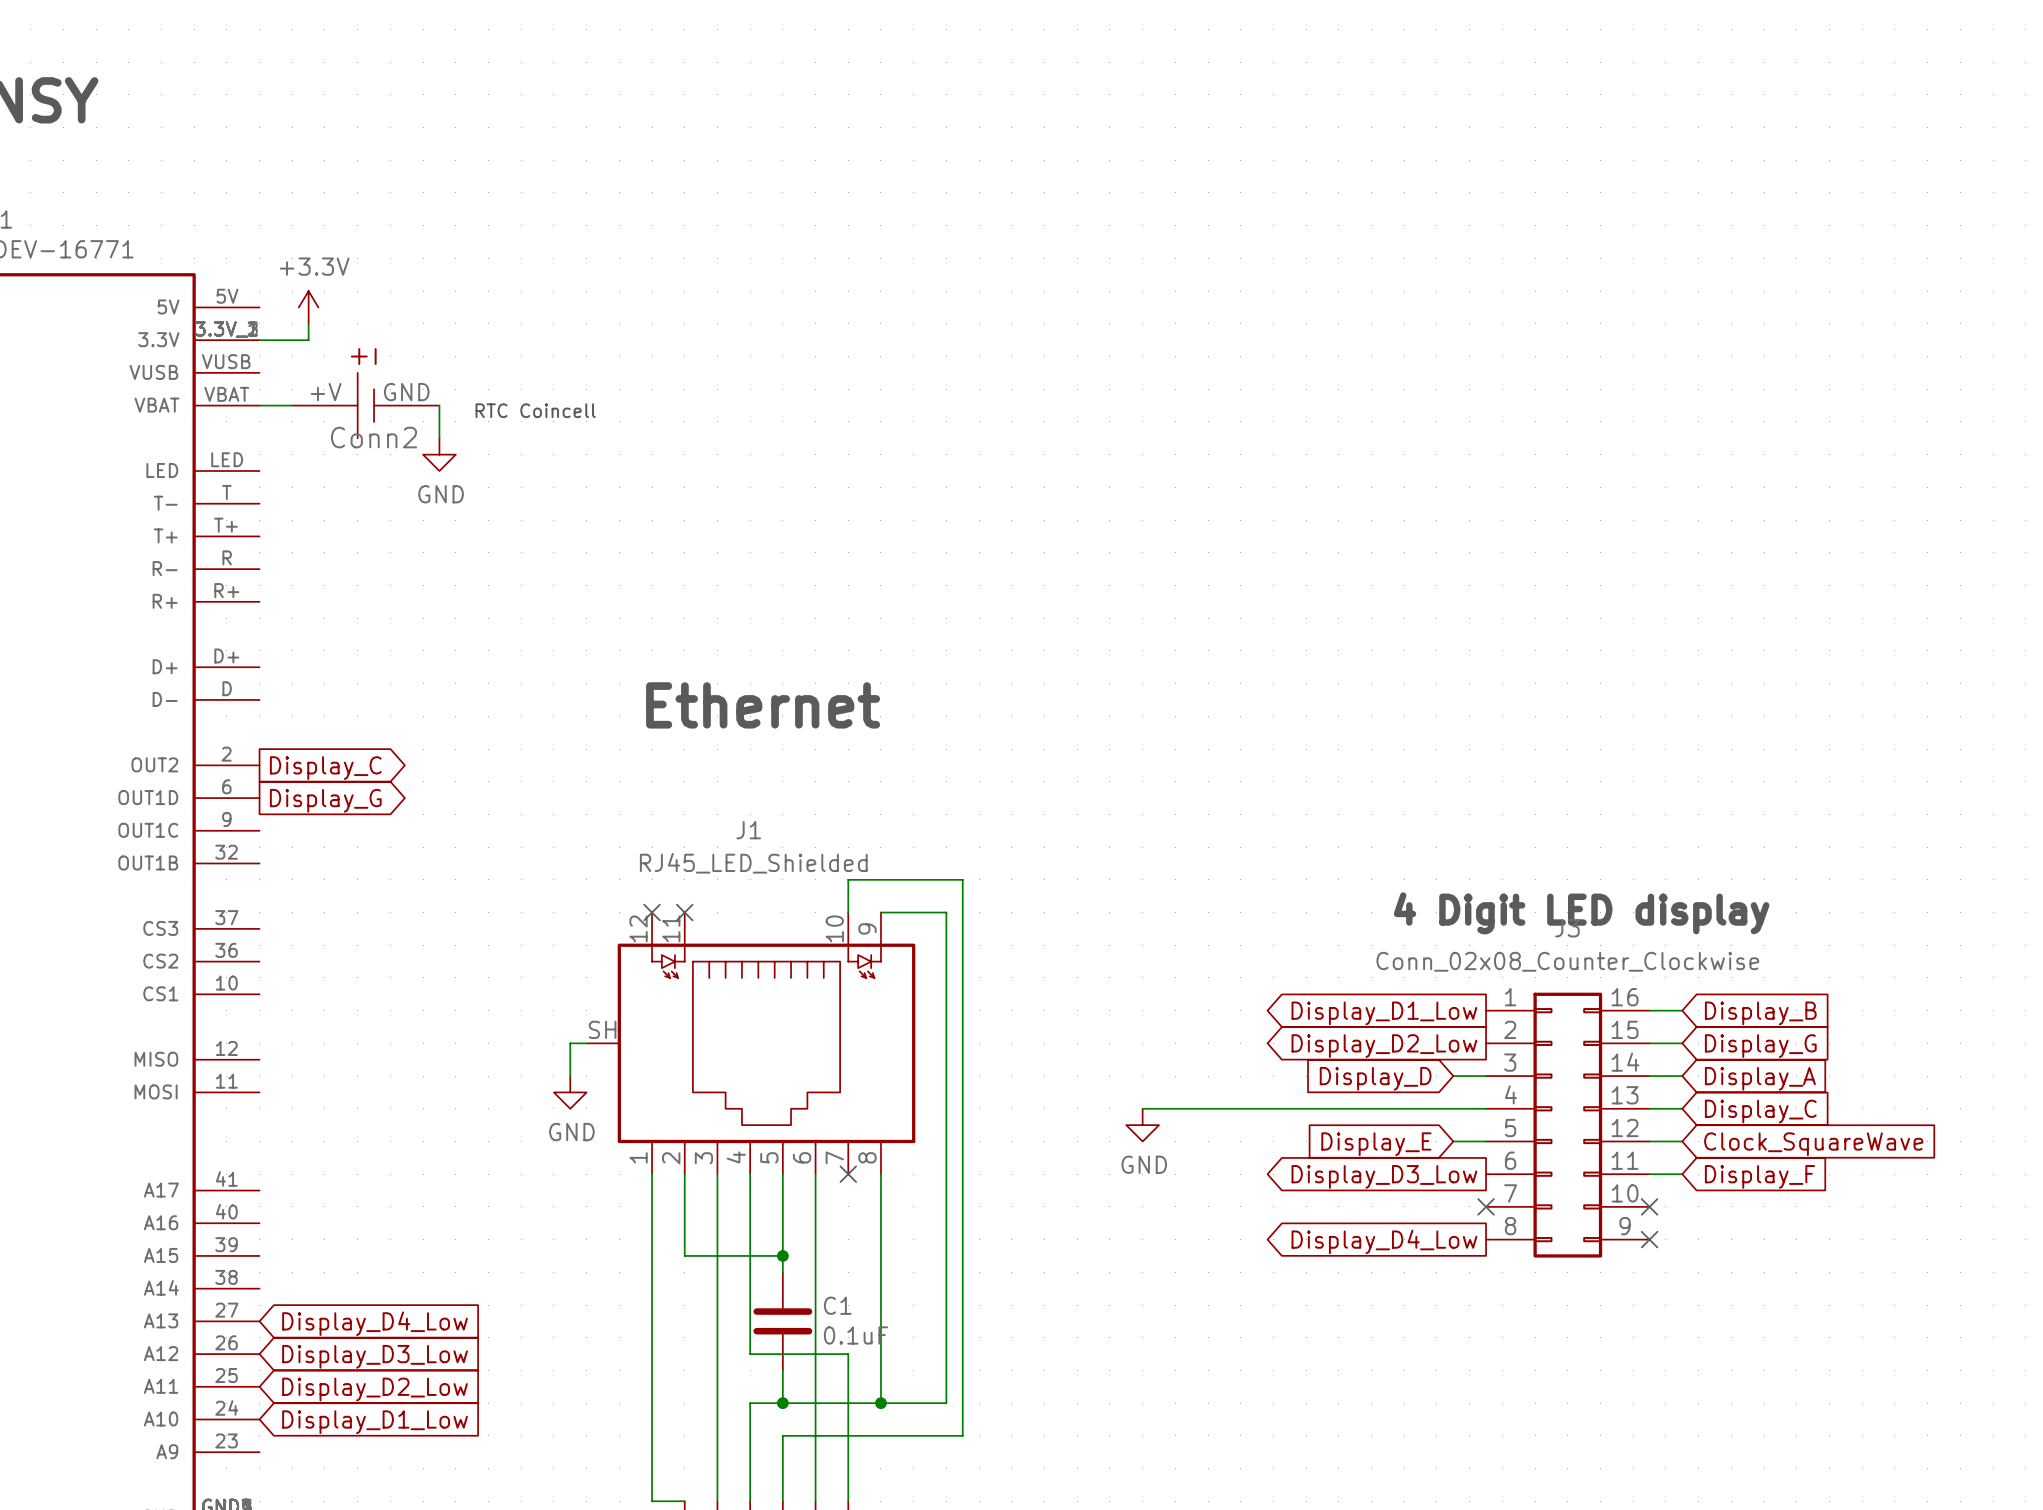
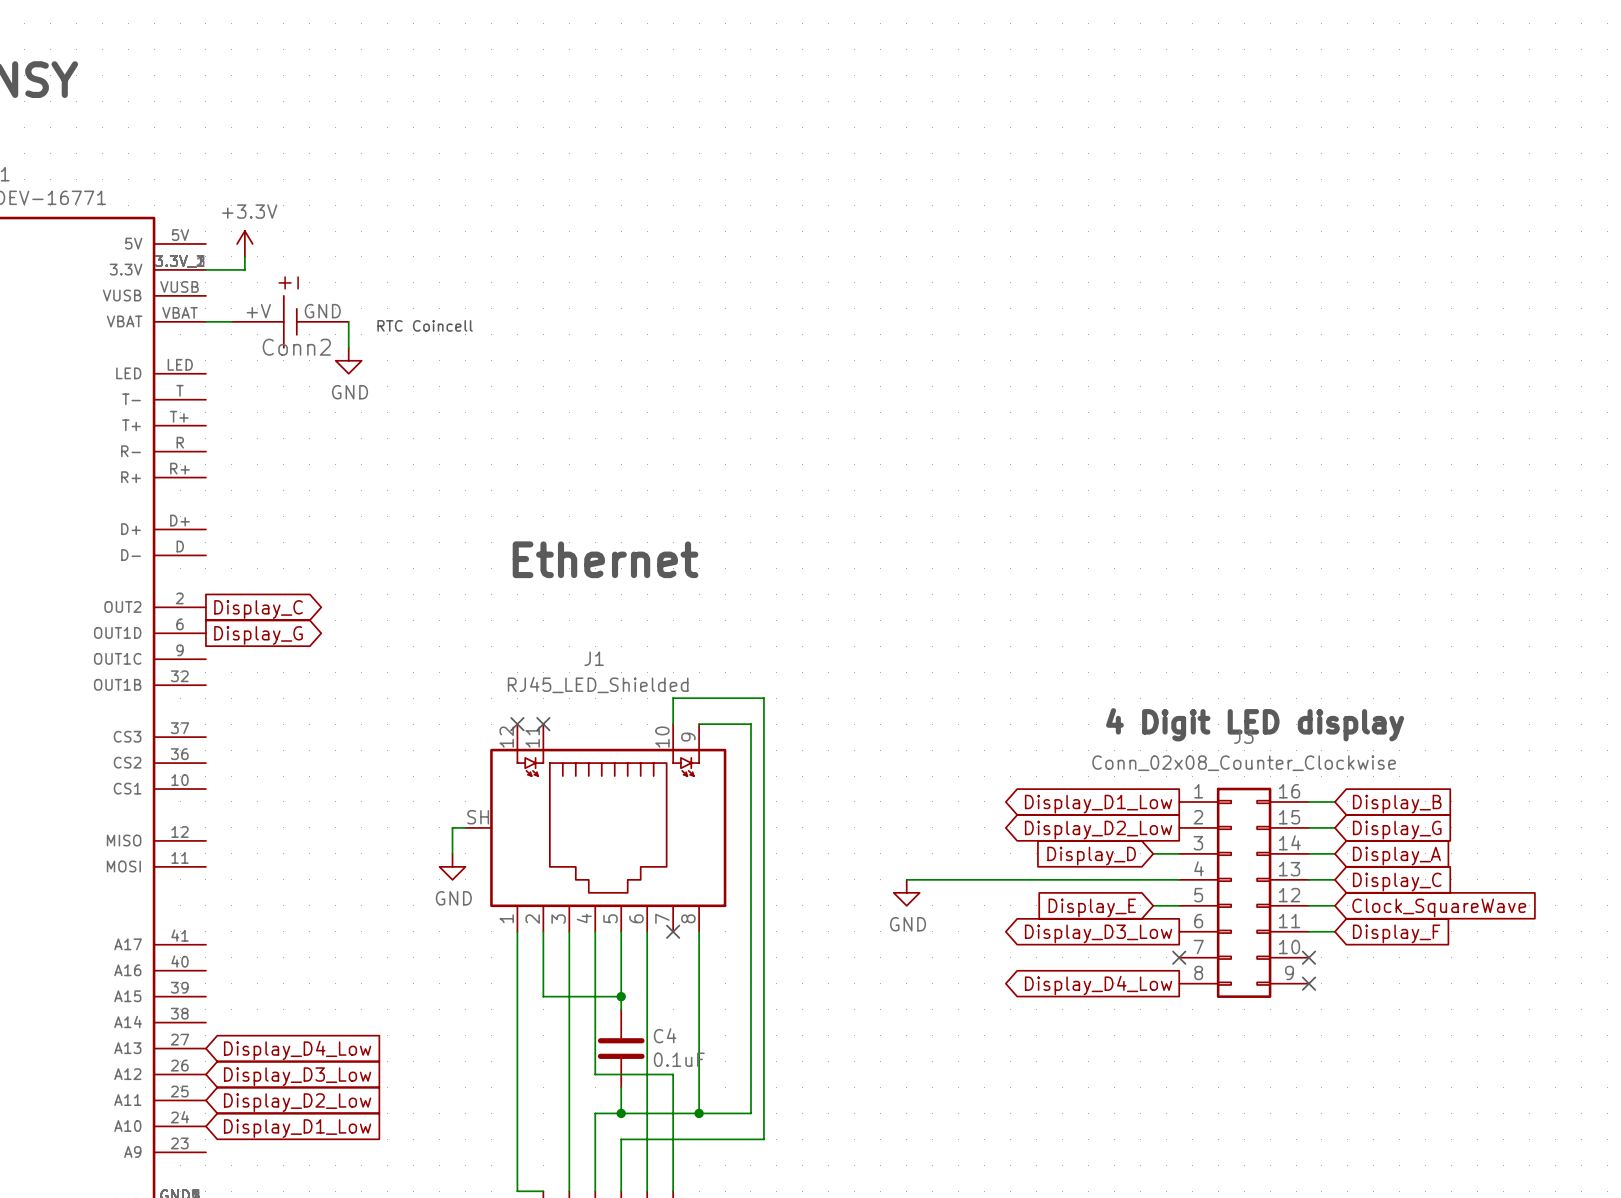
C1 name: C1 (837, 1305) -> C4 (665, 1035)

